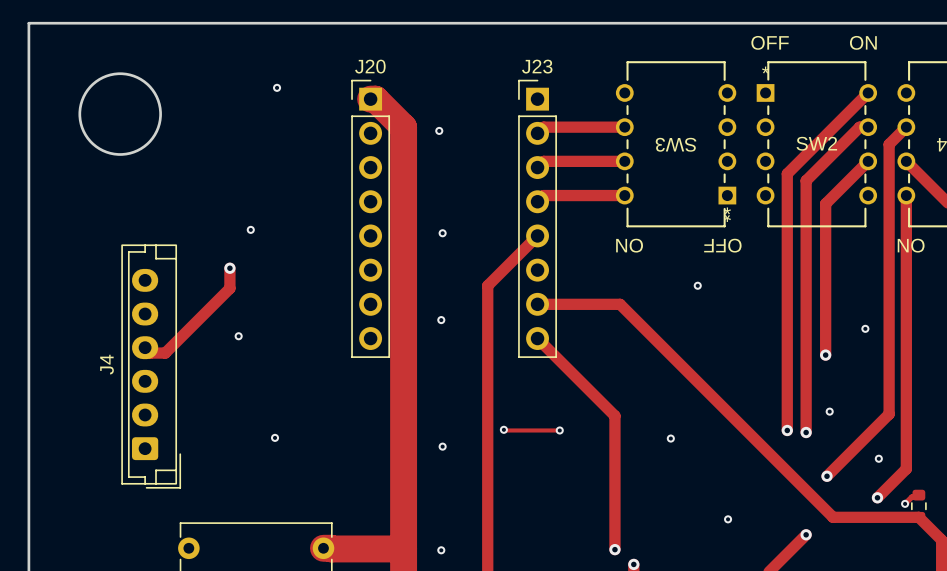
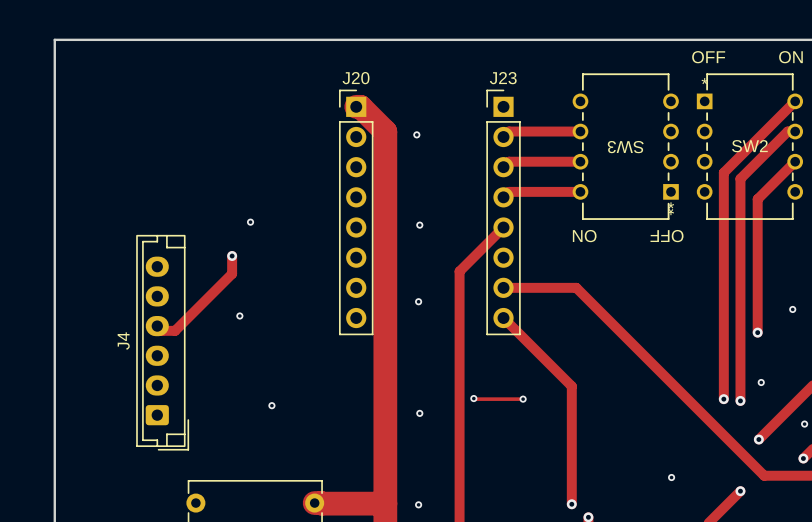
round board edge: [78, 72, 162, 156] -> none
via: (277, 87) -> none
via: (697, 285) -> none
via: (670, 438) -> none

